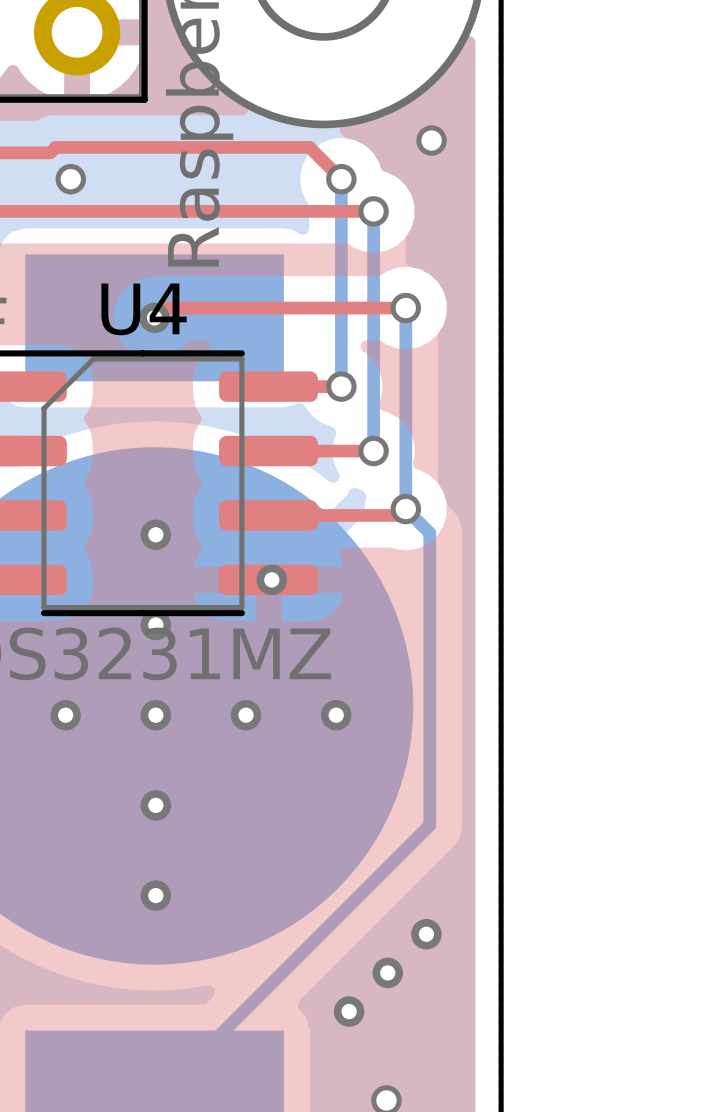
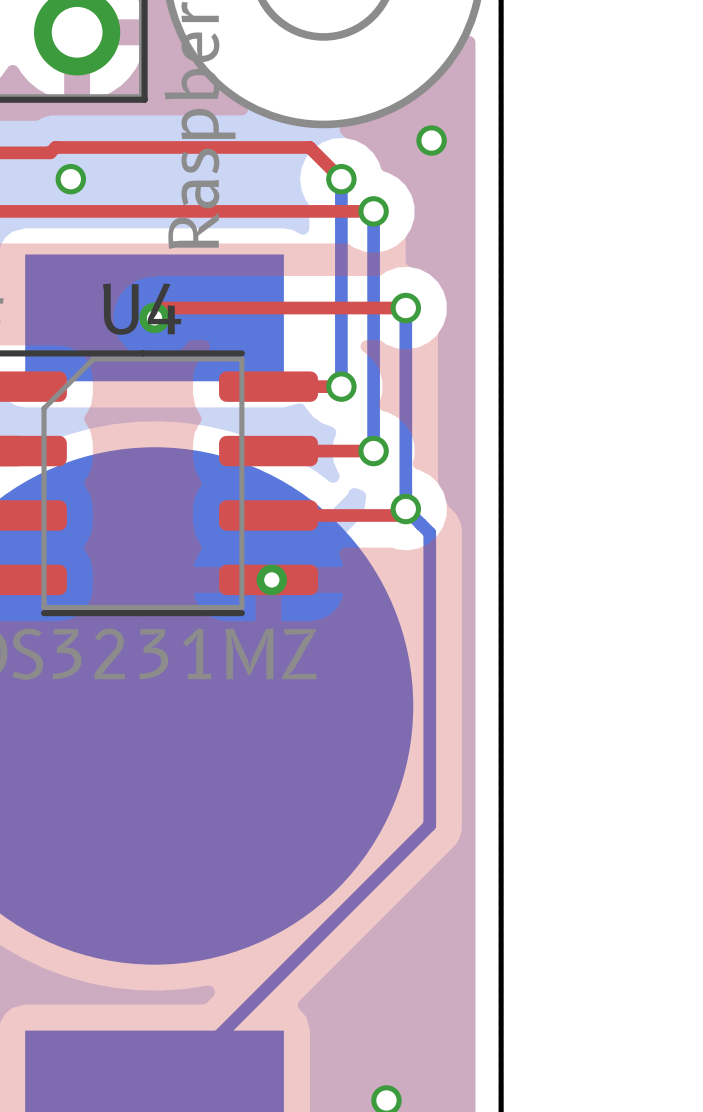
via: (155, 534) -> none
via: (155, 625) -> none
via: (65, 715) -> none
via: (155, 715) -> none
via: (246, 715) -> none
via: (336, 715) -> none
via: (155, 805) -> none
via: (155, 895) -> none
via: (426, 934) -> none
via: (387, 972) -> none
via: (349, 1011) -> none

